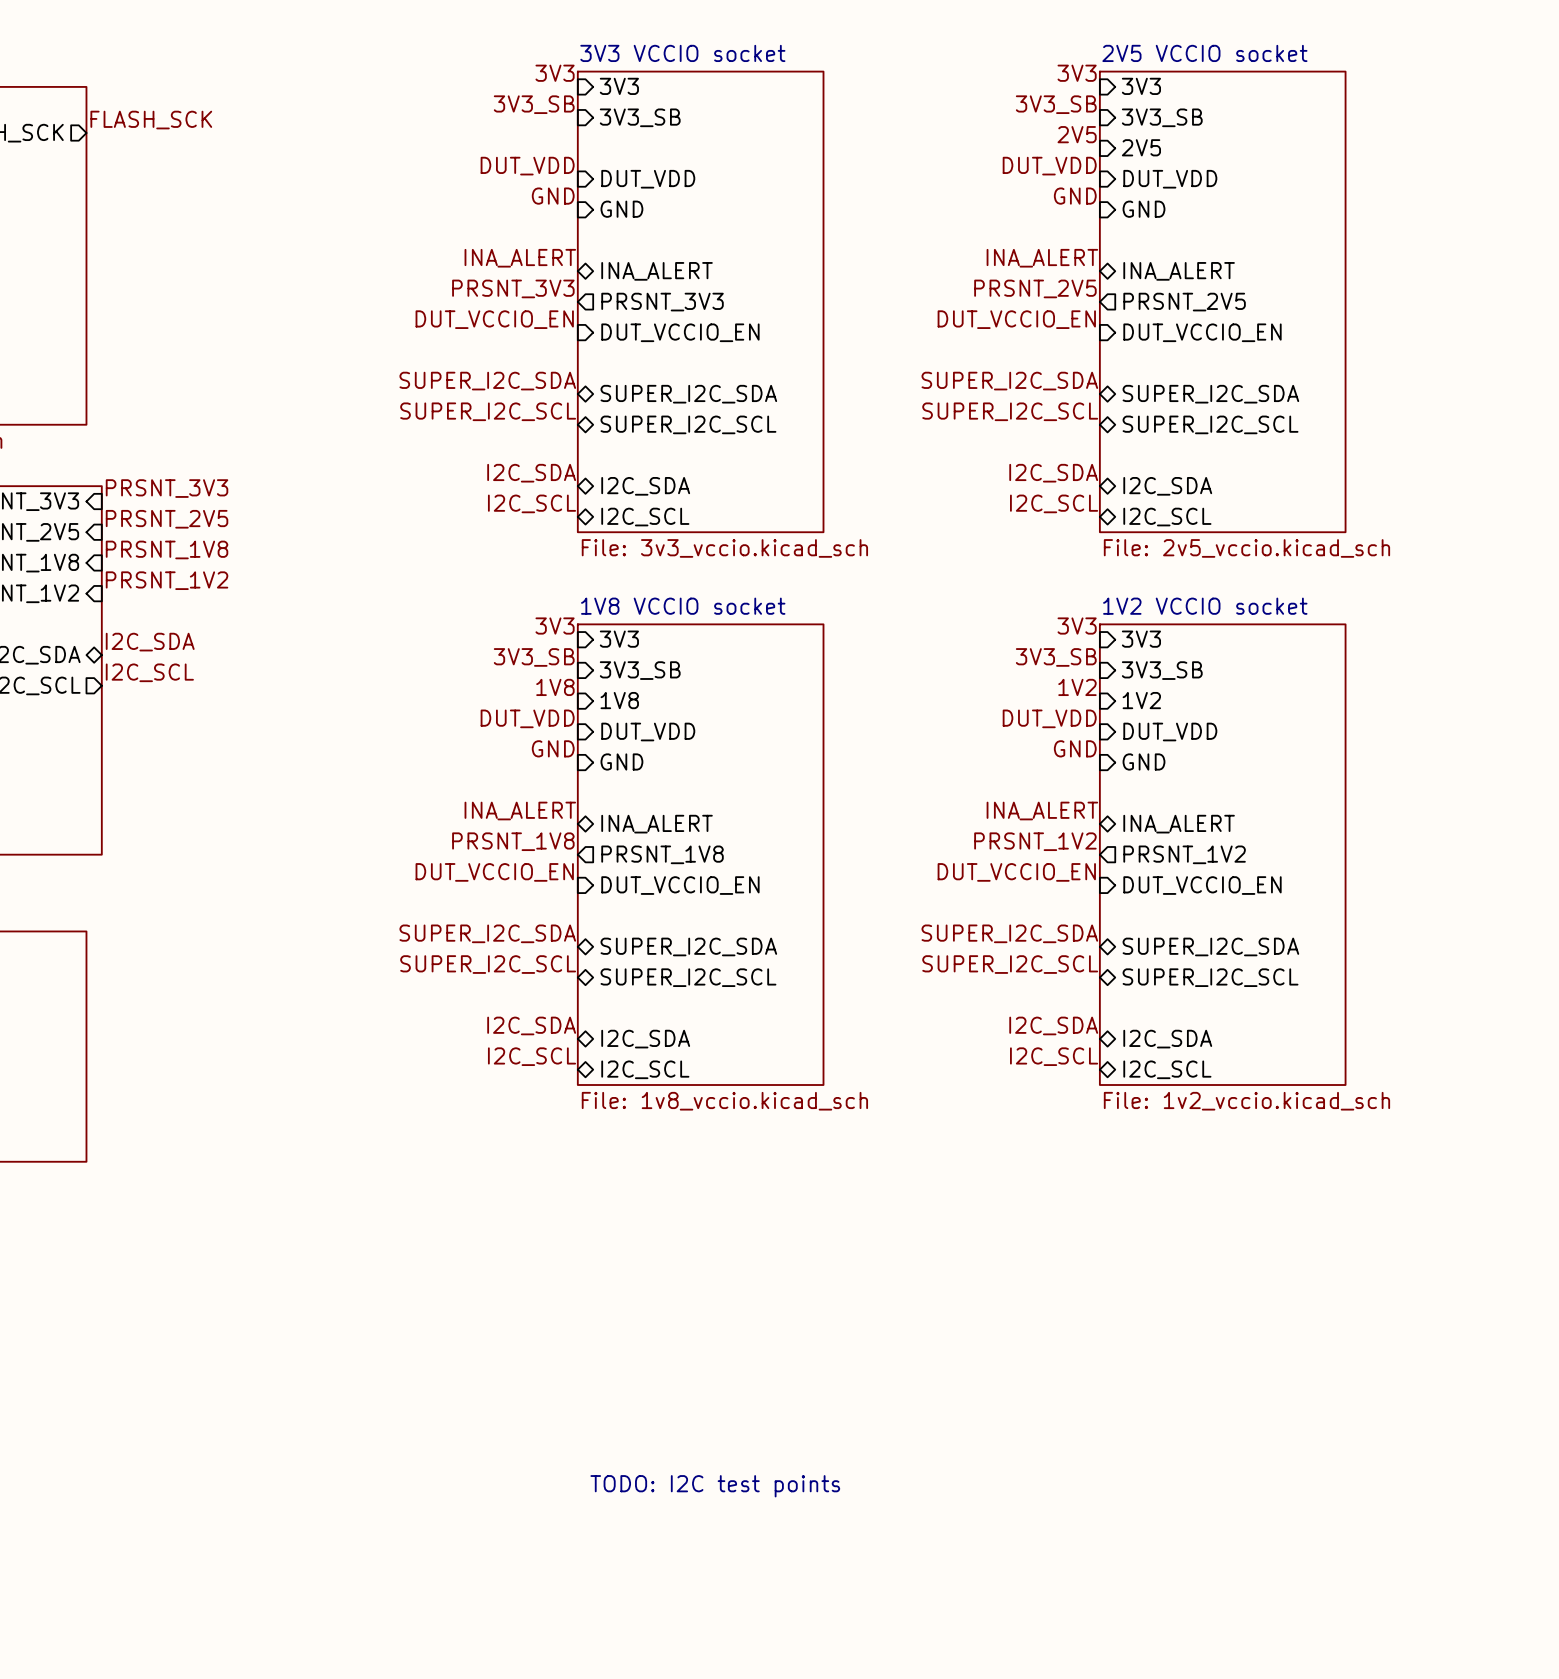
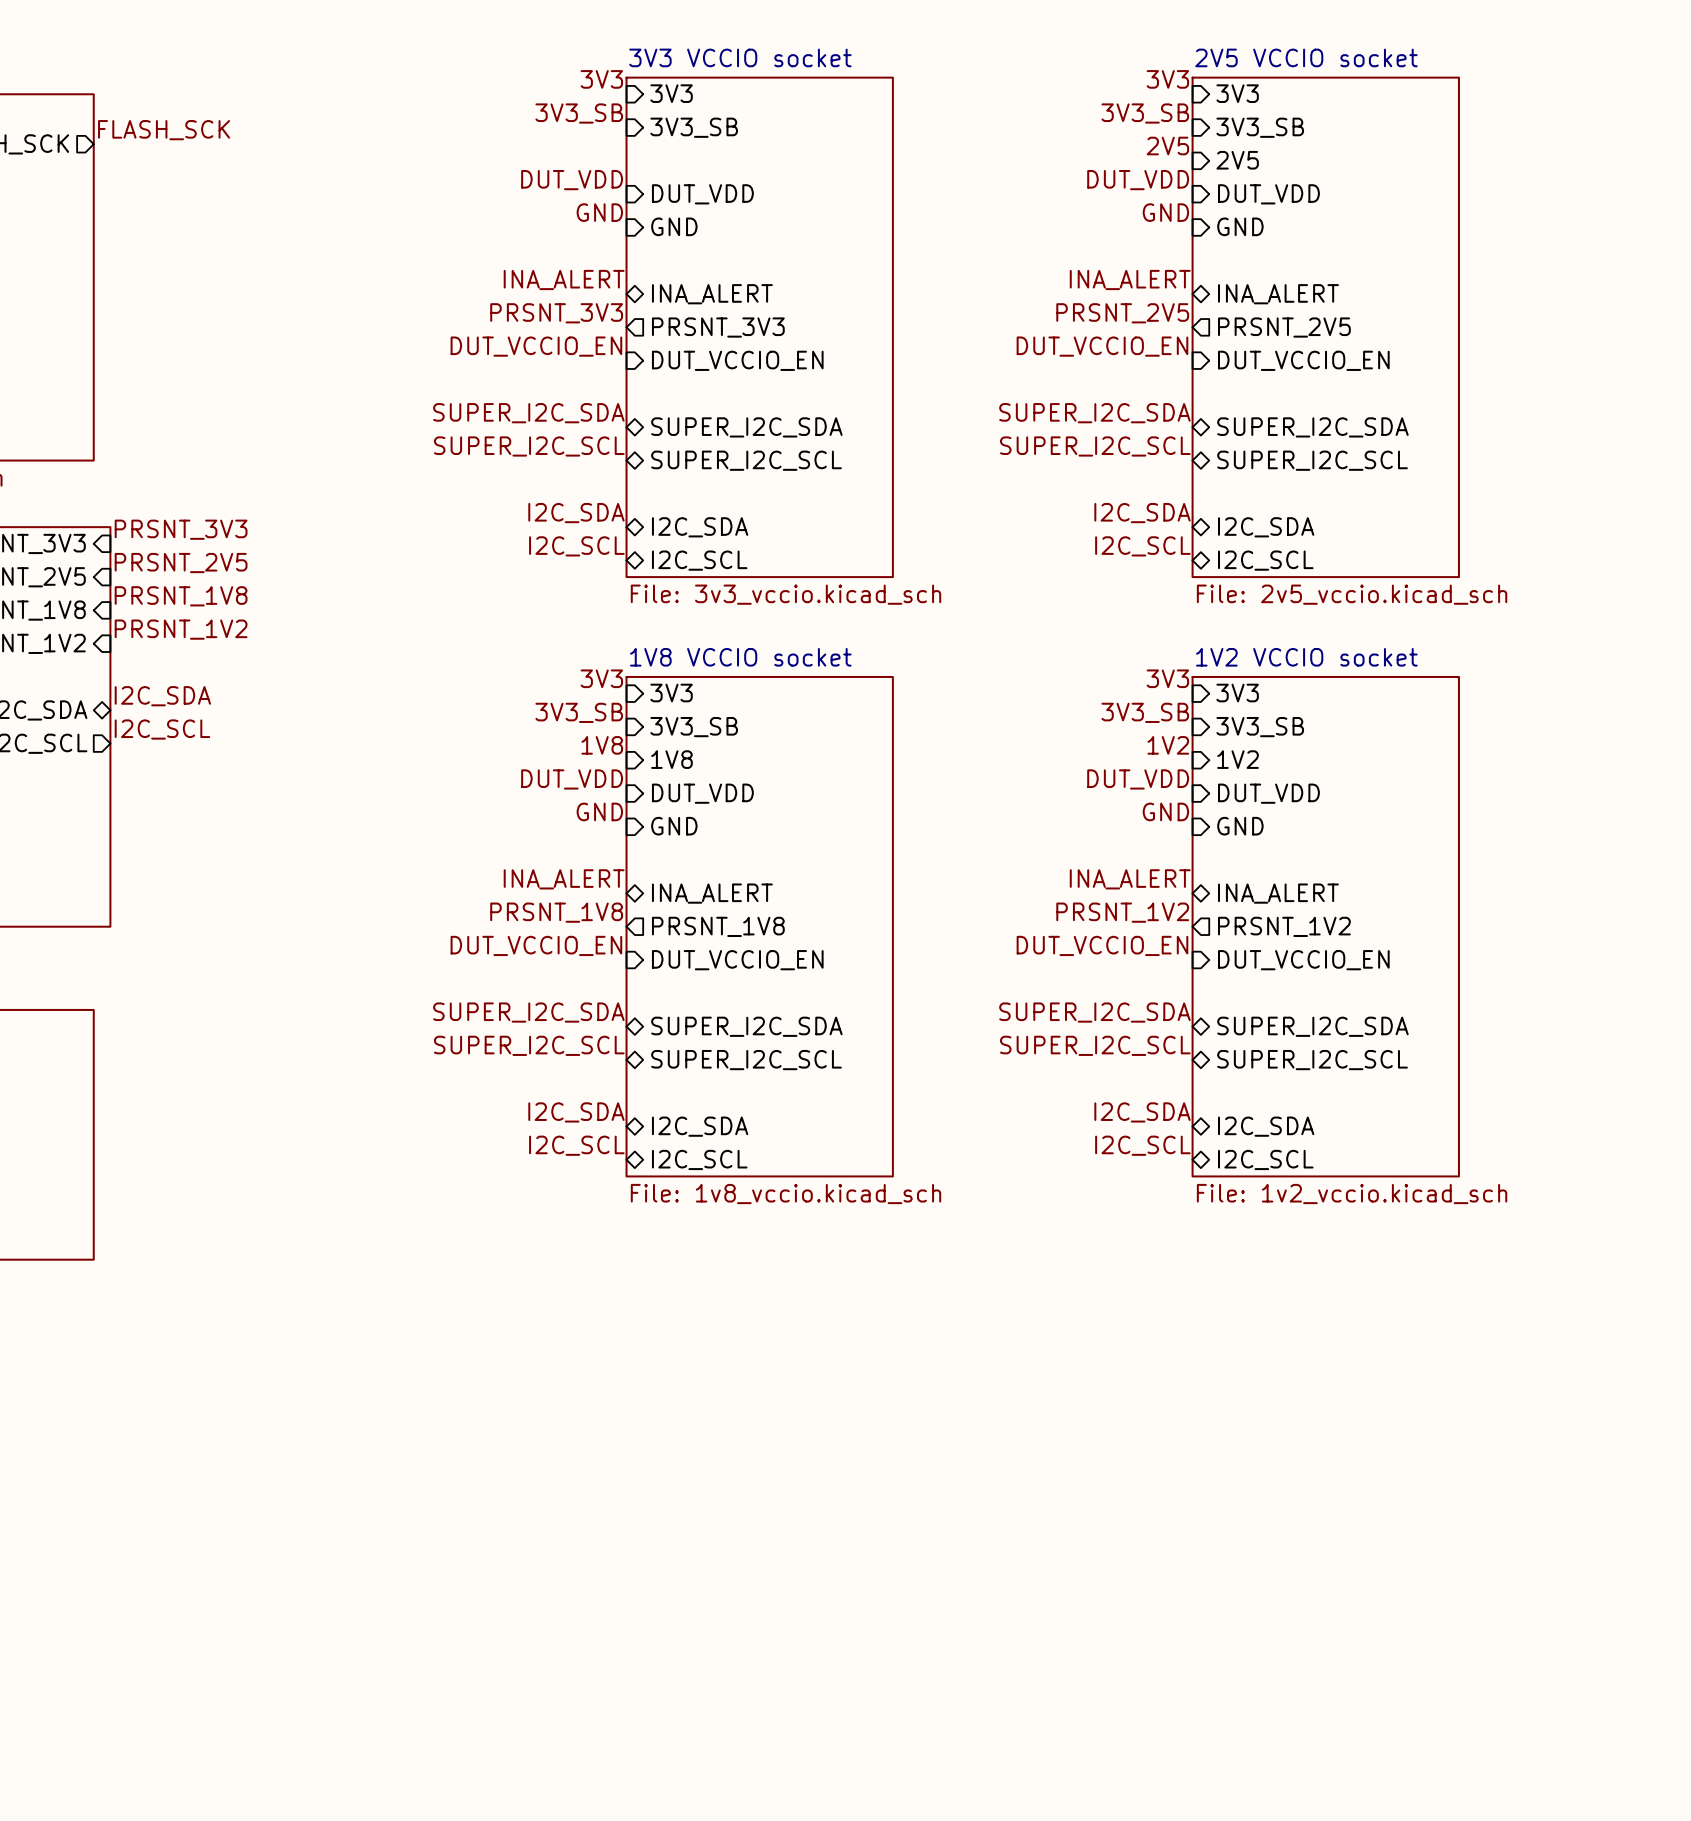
text: TODO: I2C test points (715, 1486) -> none

